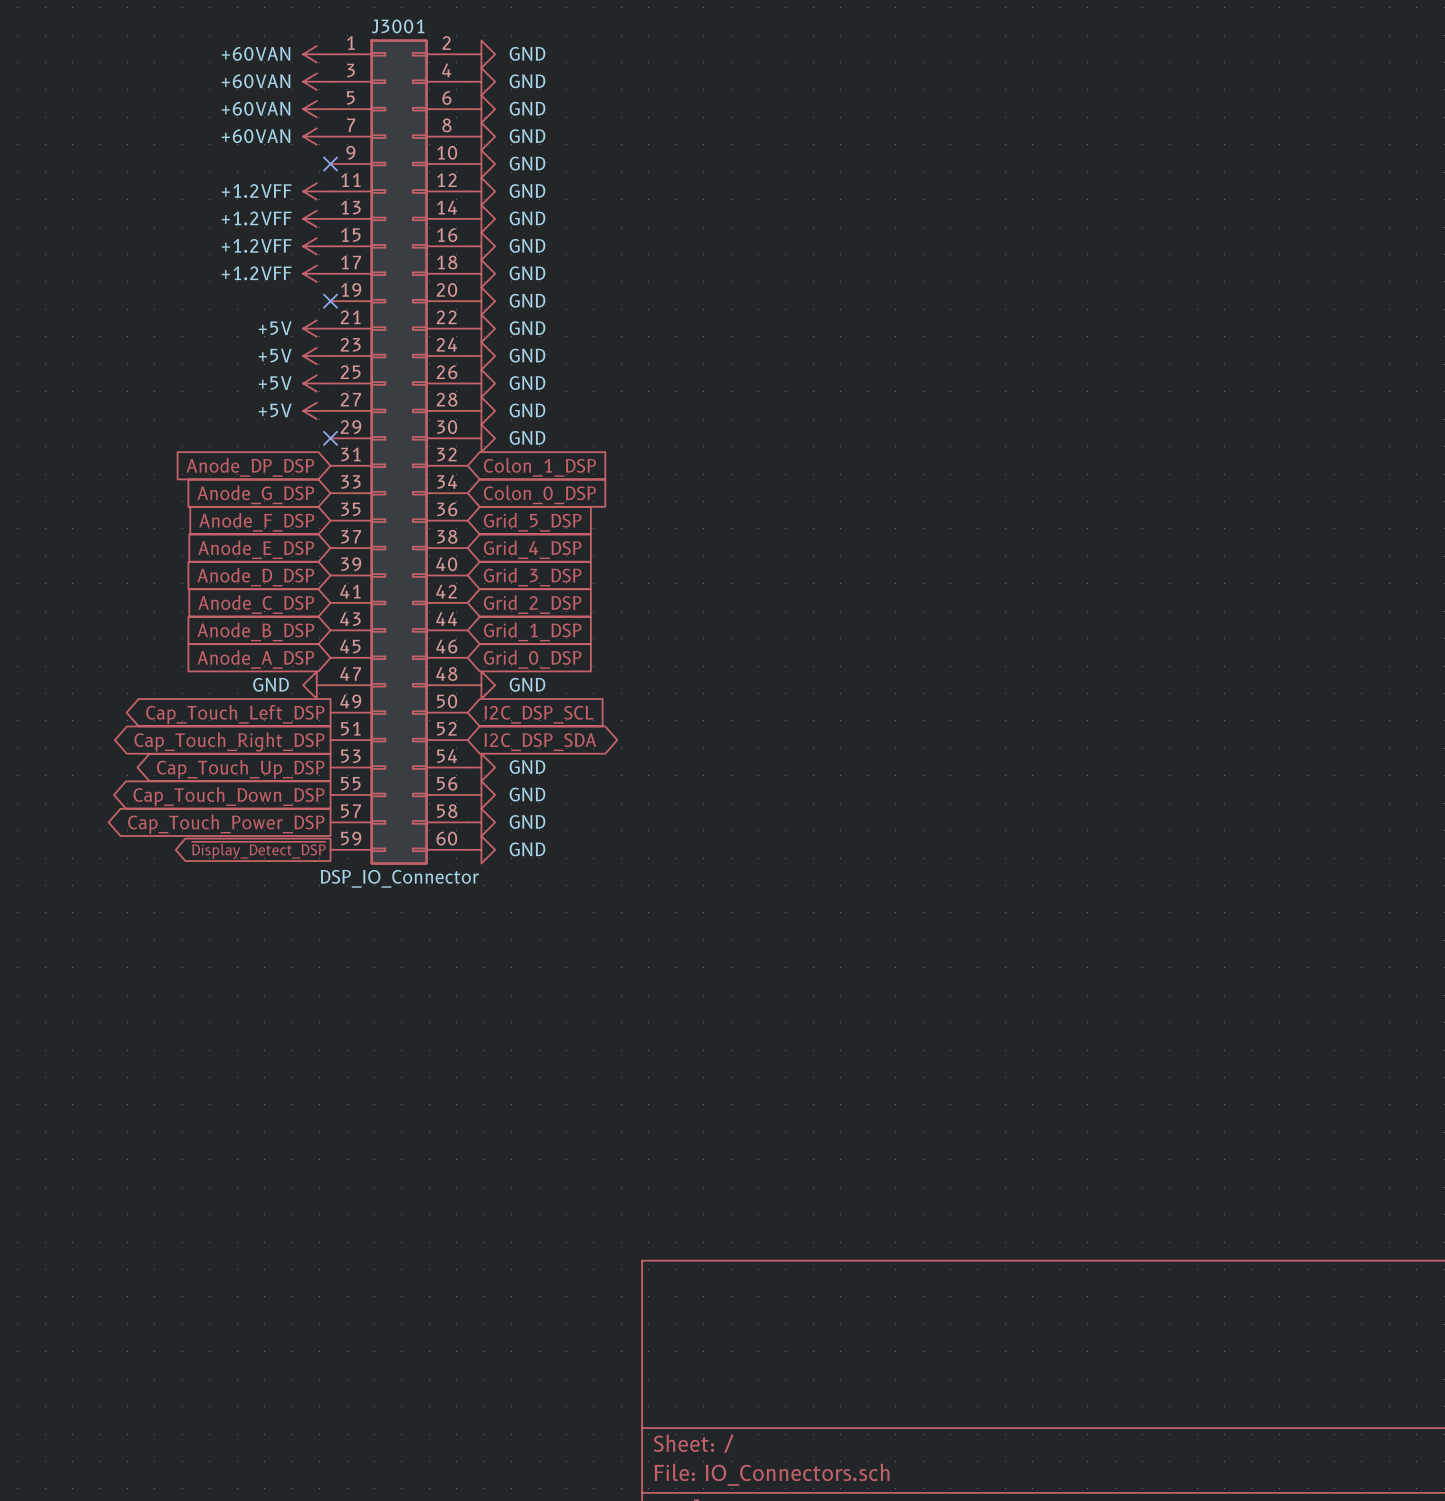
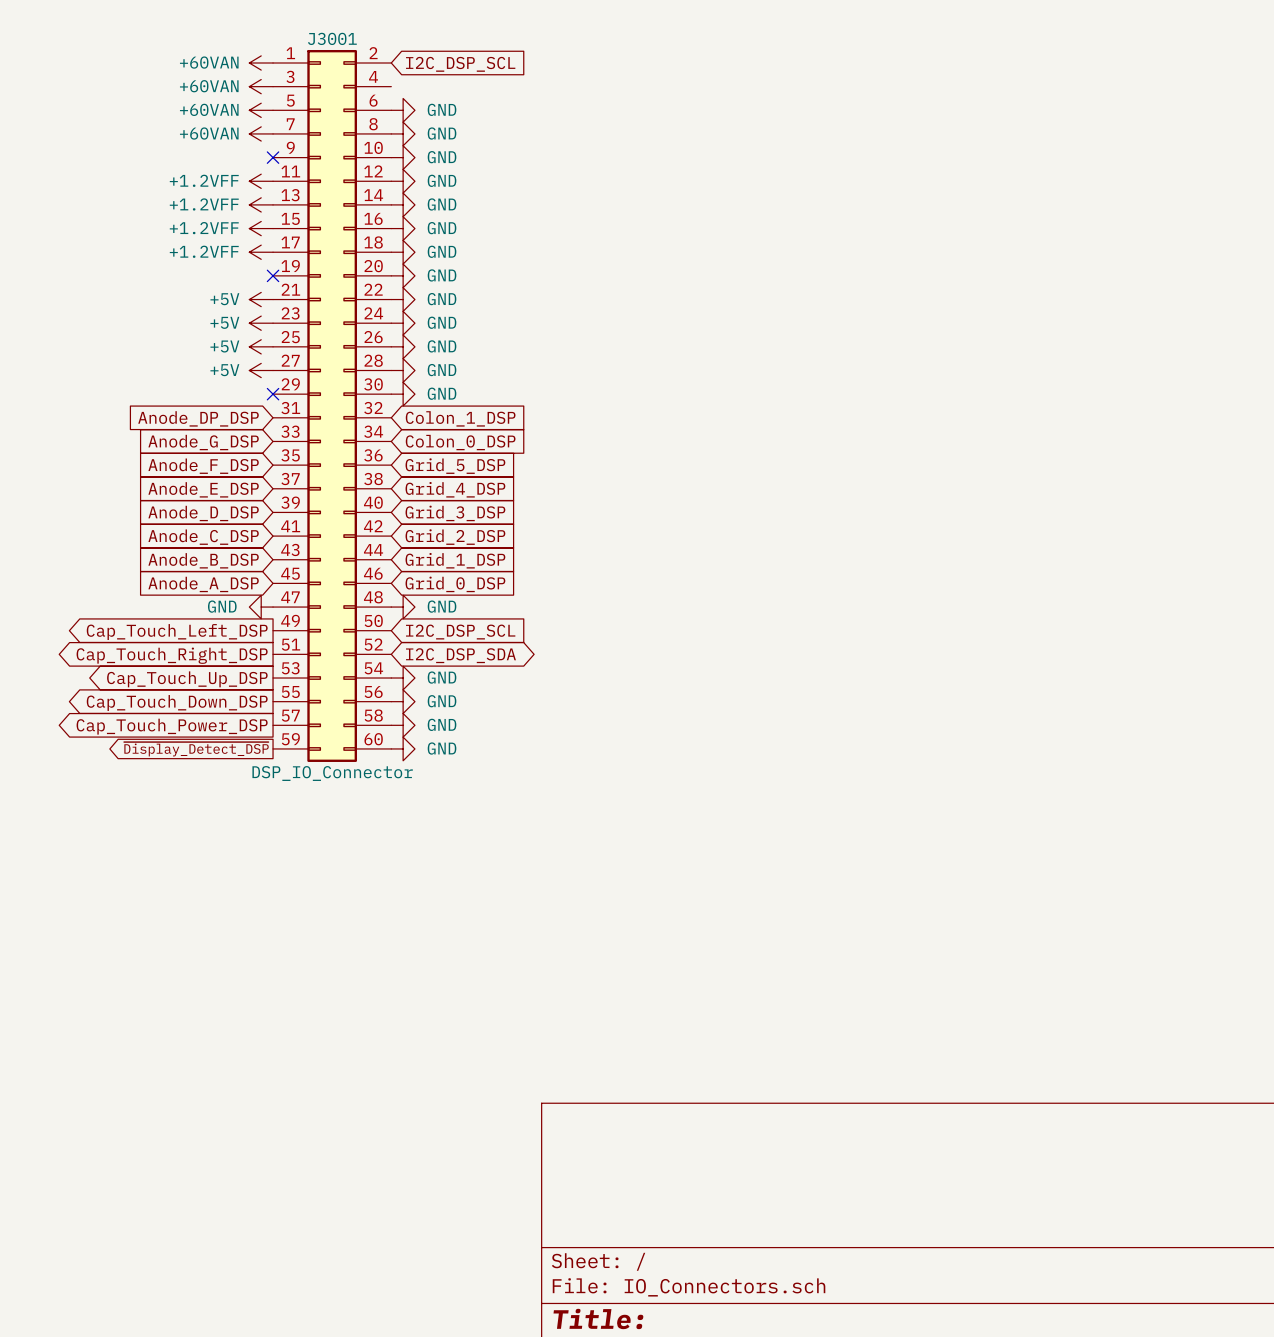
power symbol: GND (481, 54) -> none
global label: none -> I2C_DSP_SCL (460, 64)
power symbol: GND (481, 81) -> none

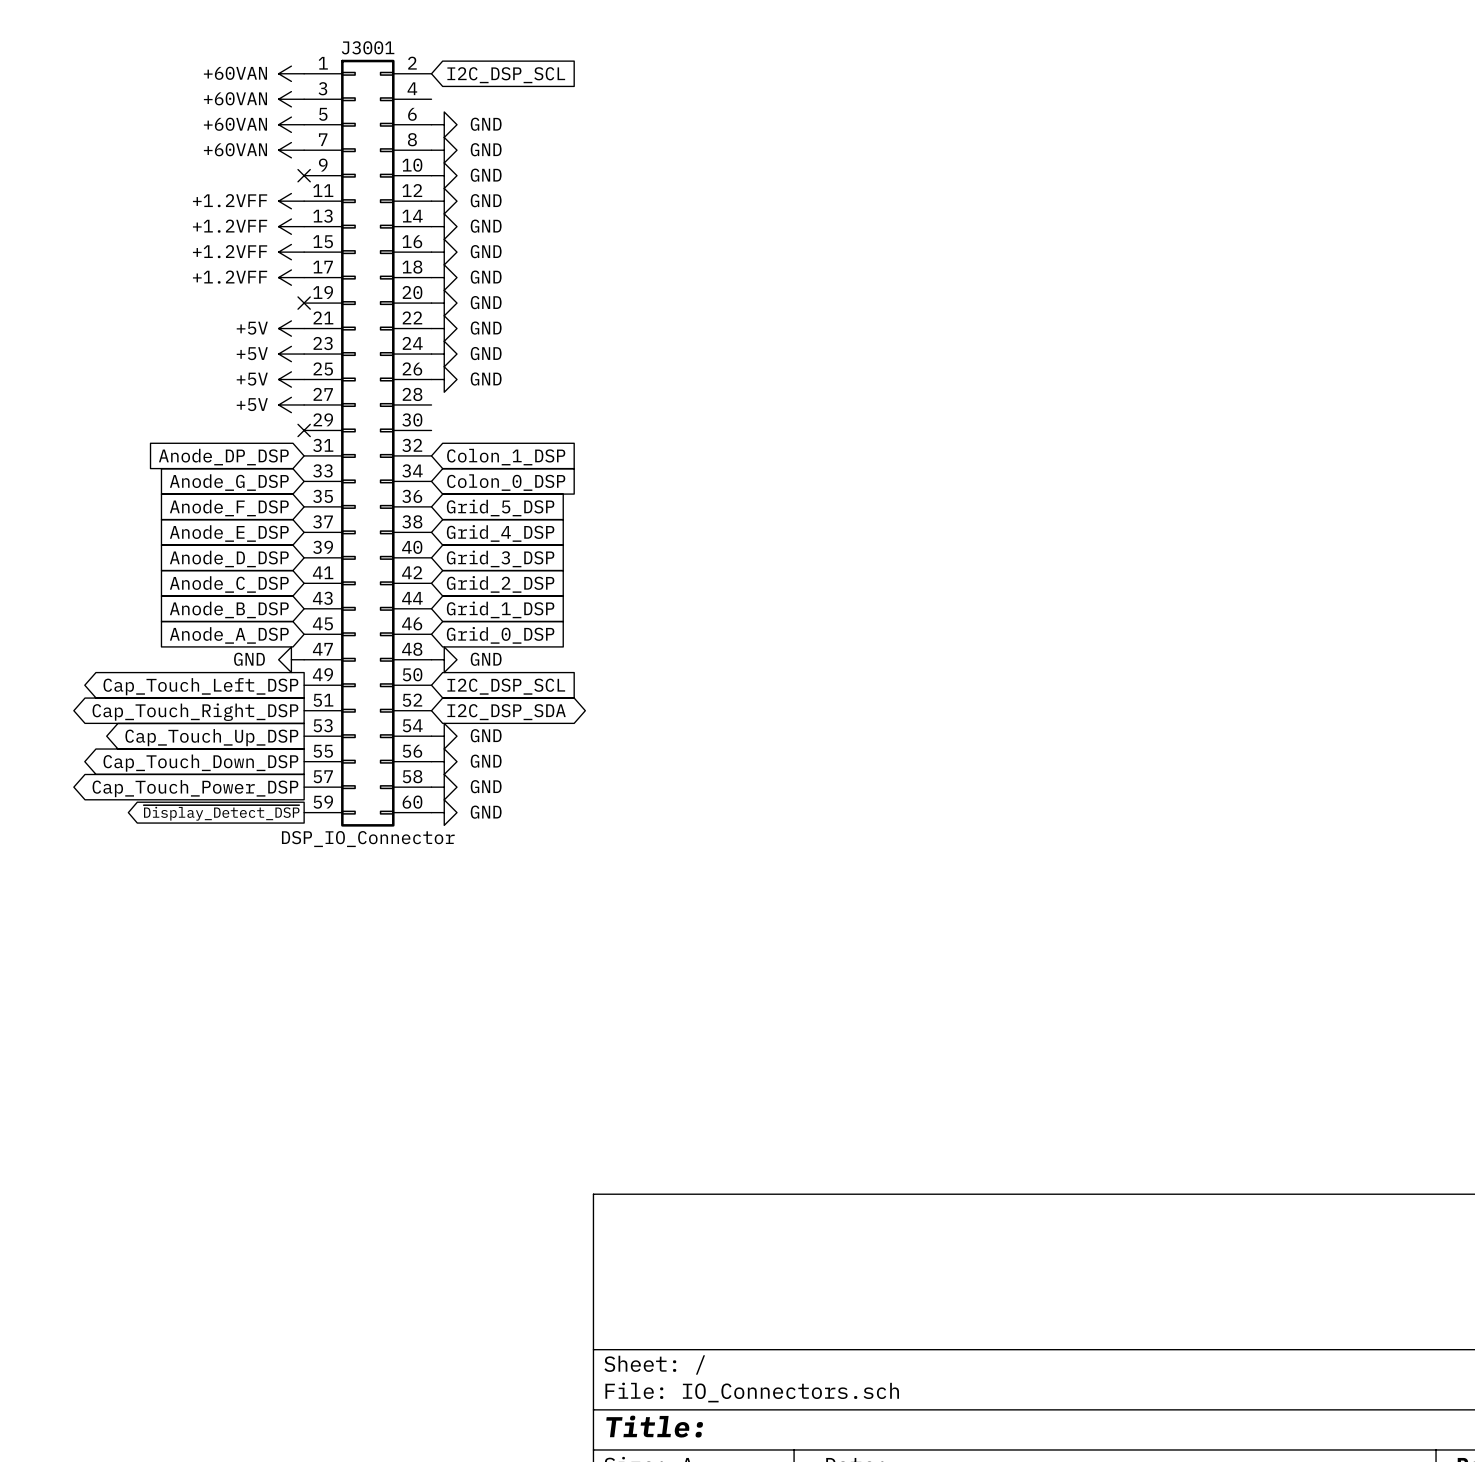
power symbol: GND (403, 370) -> none
power symbol: GND (403, 394) -> none

